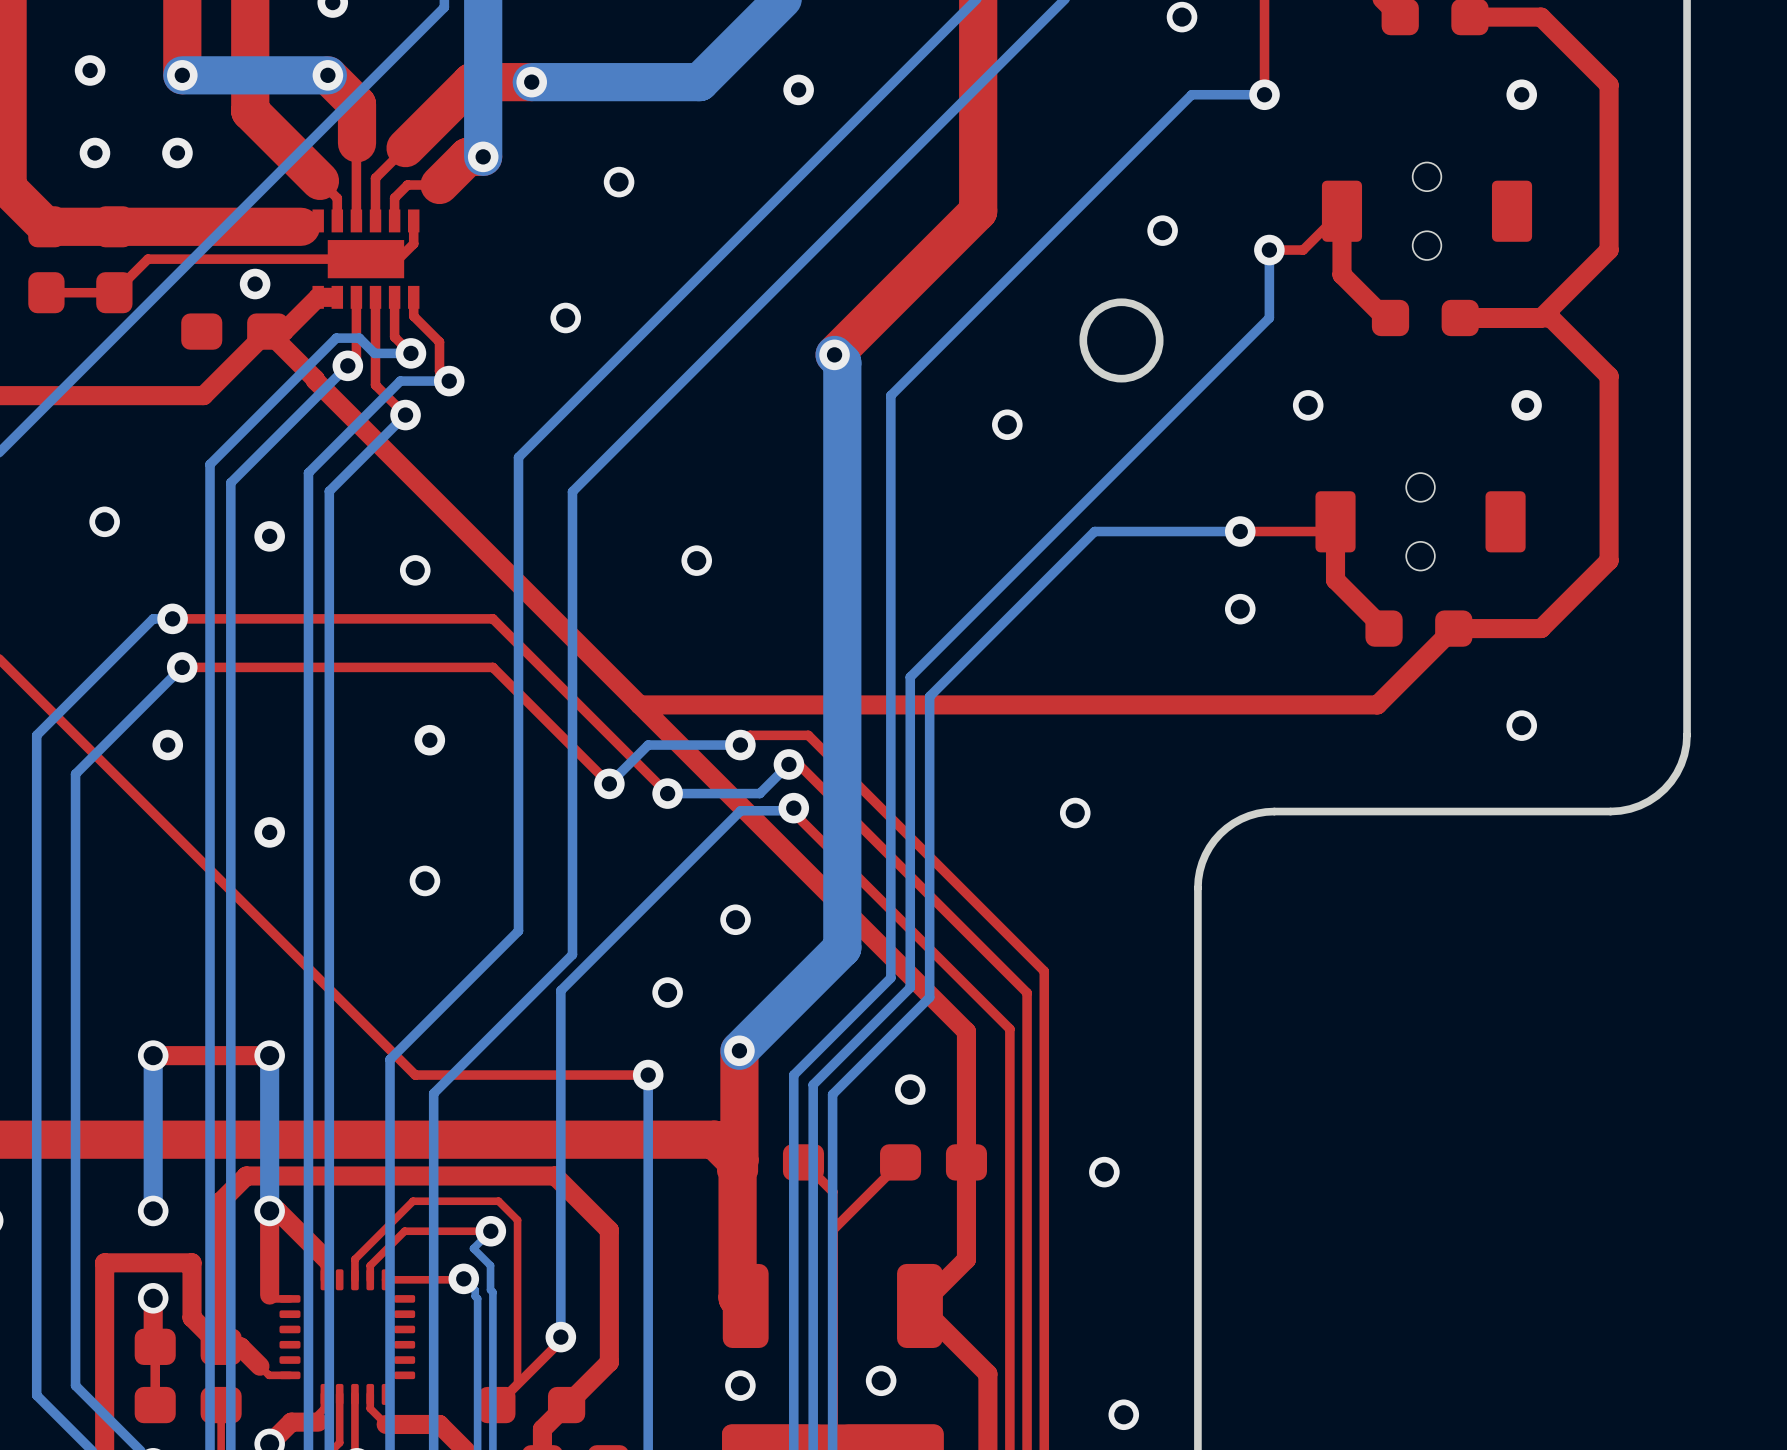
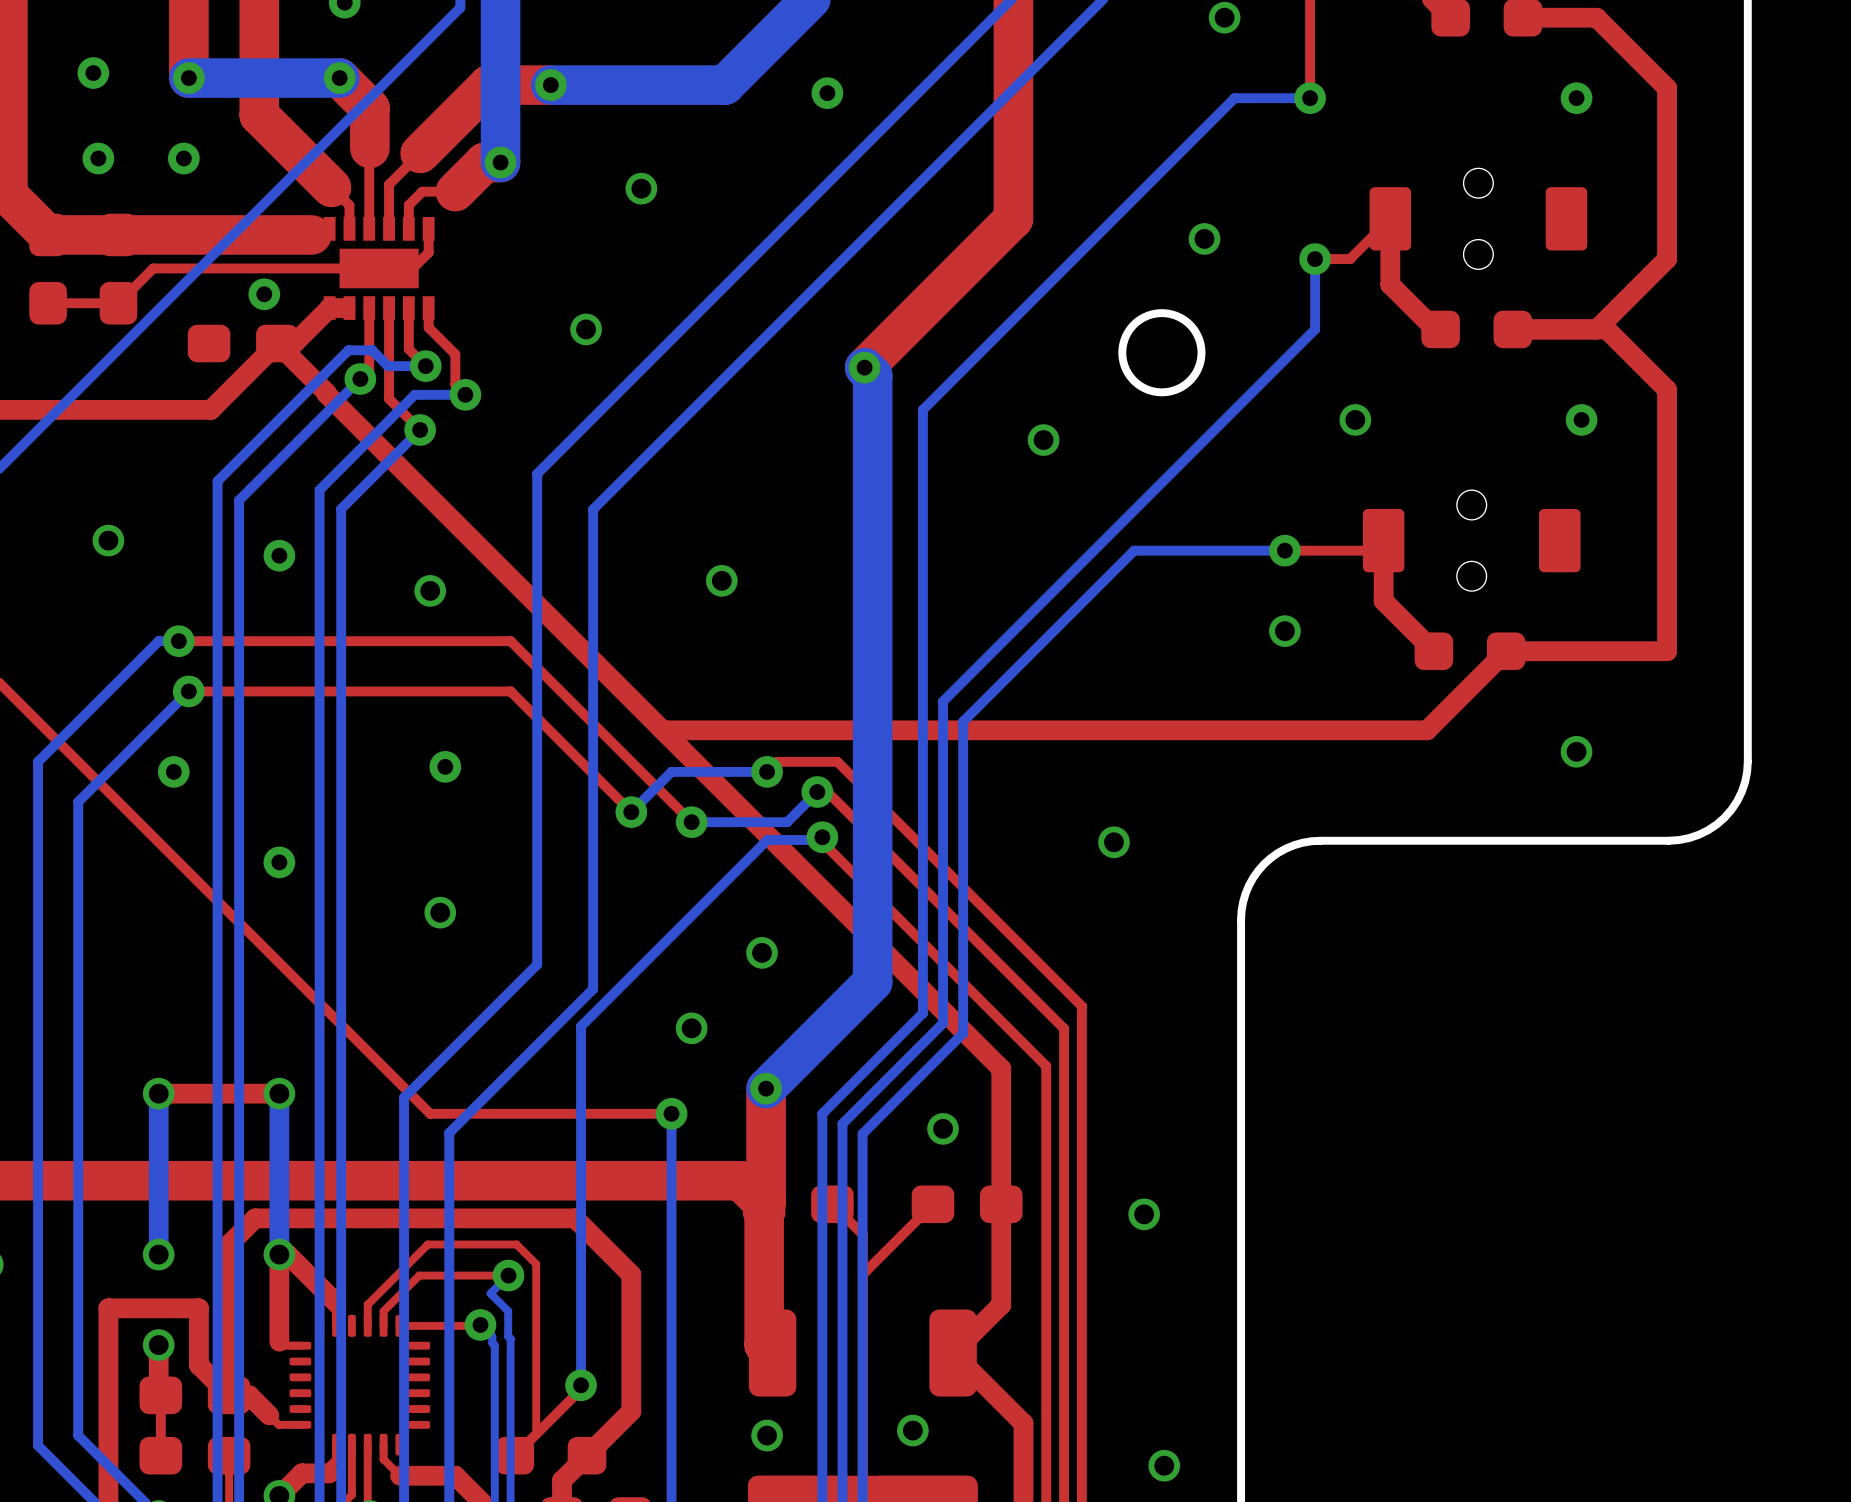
top track: (1609, 560) (1541, 628) -> (1667, 580) (1667, 651) (1596, 651)

